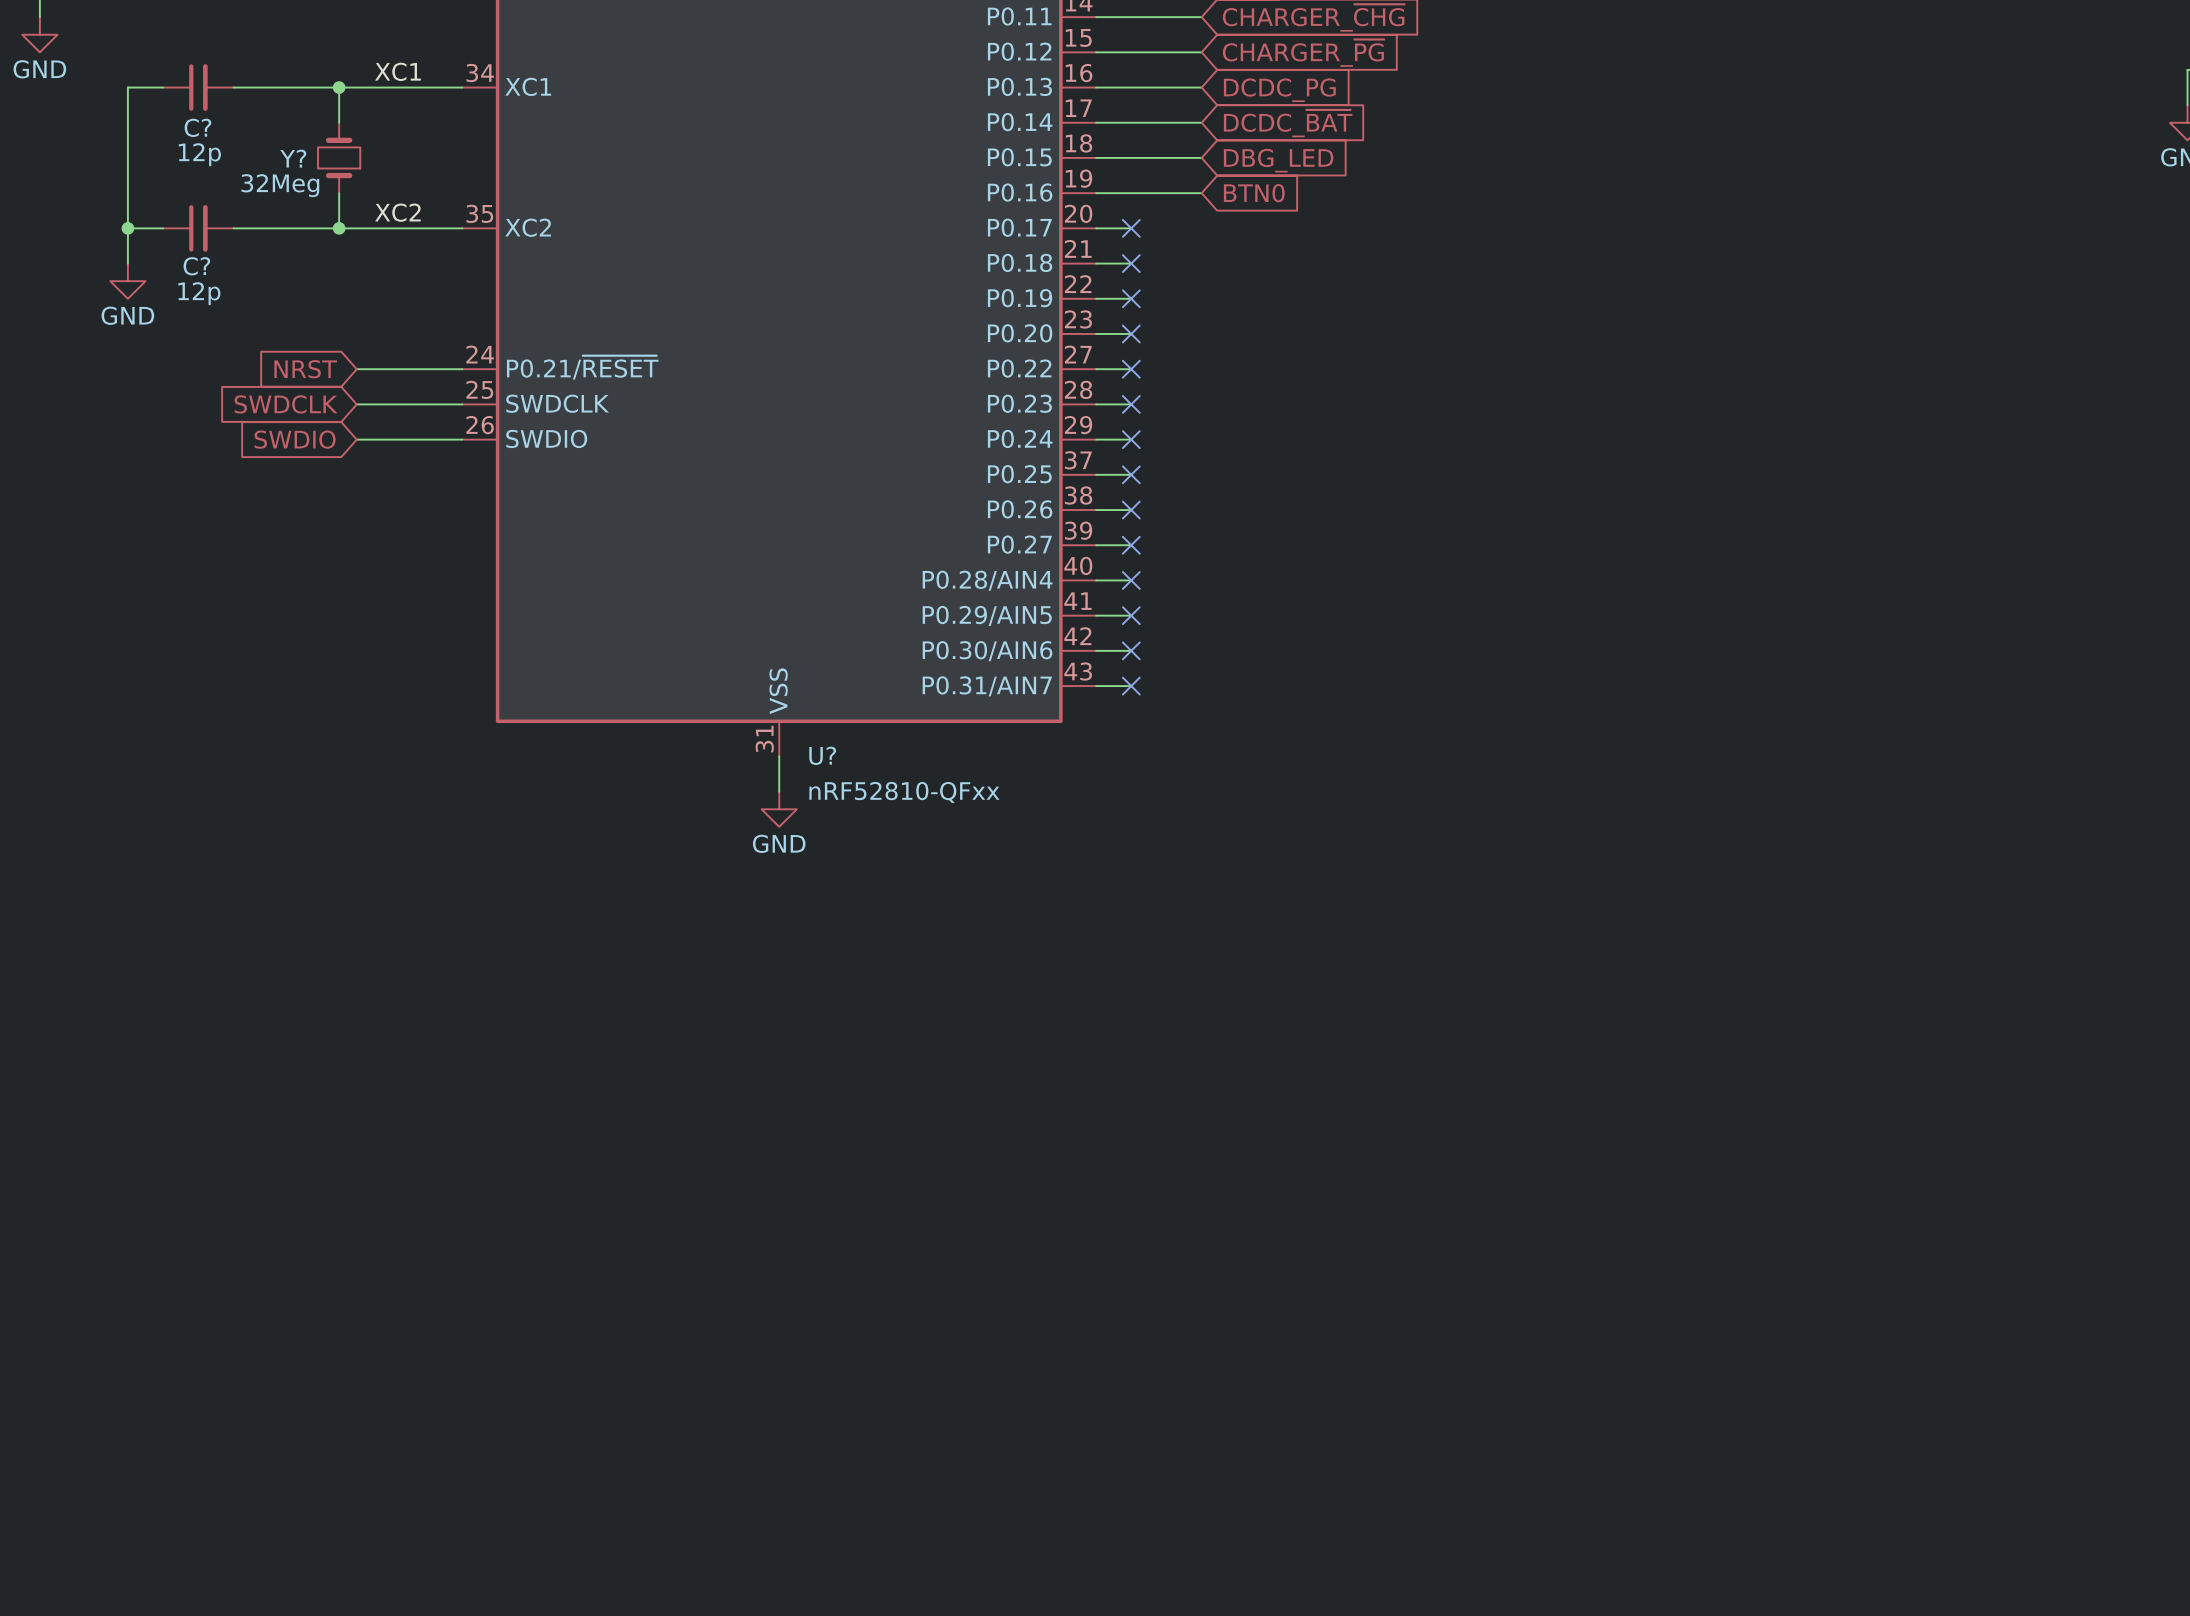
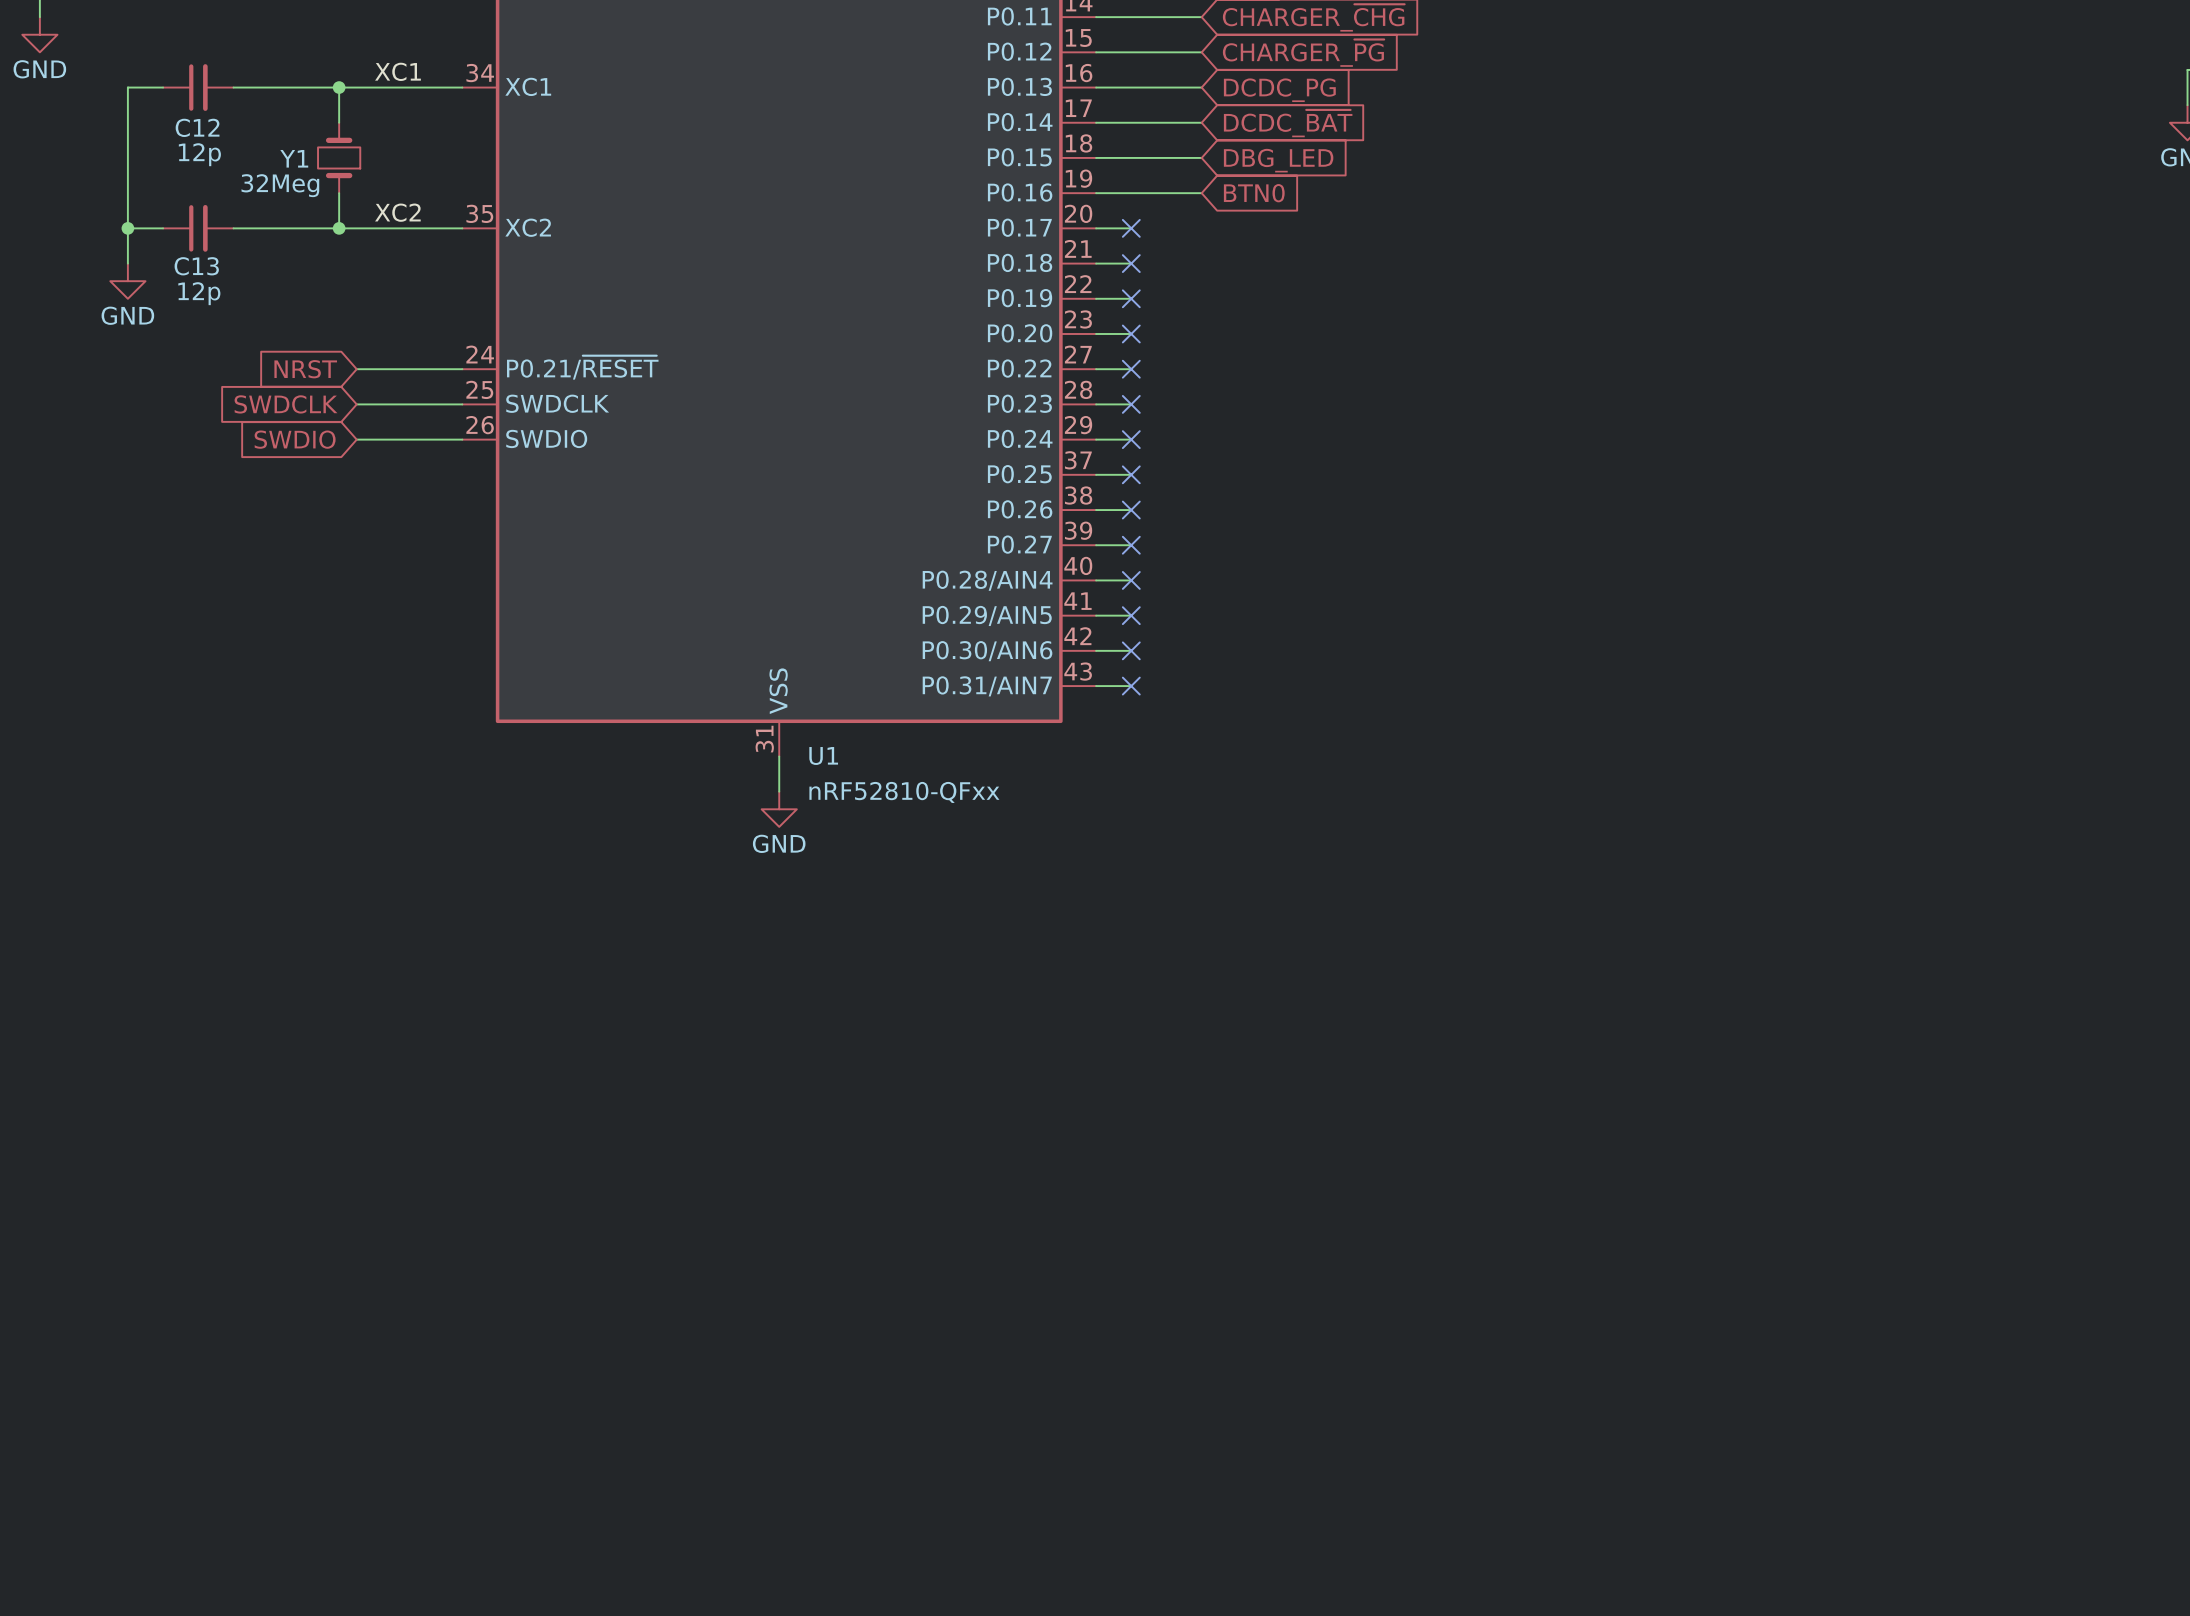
C? name: C? (197, 127) -> C12 (197, 127)
Y? name: Y? (293, 158) -> Y1 (294, 158)
C? name: C? (196, 266) -> C13 (196, 266)
U? name: U? (822, 755) -> U1 (823, 755)

